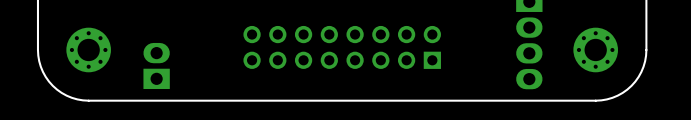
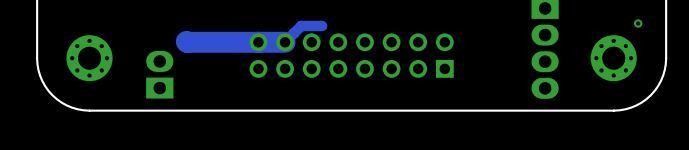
via: none -> (638, 23)
track: none -> (320, 24) (322, 26) (301, 26) (285, 42) (186, 41)

